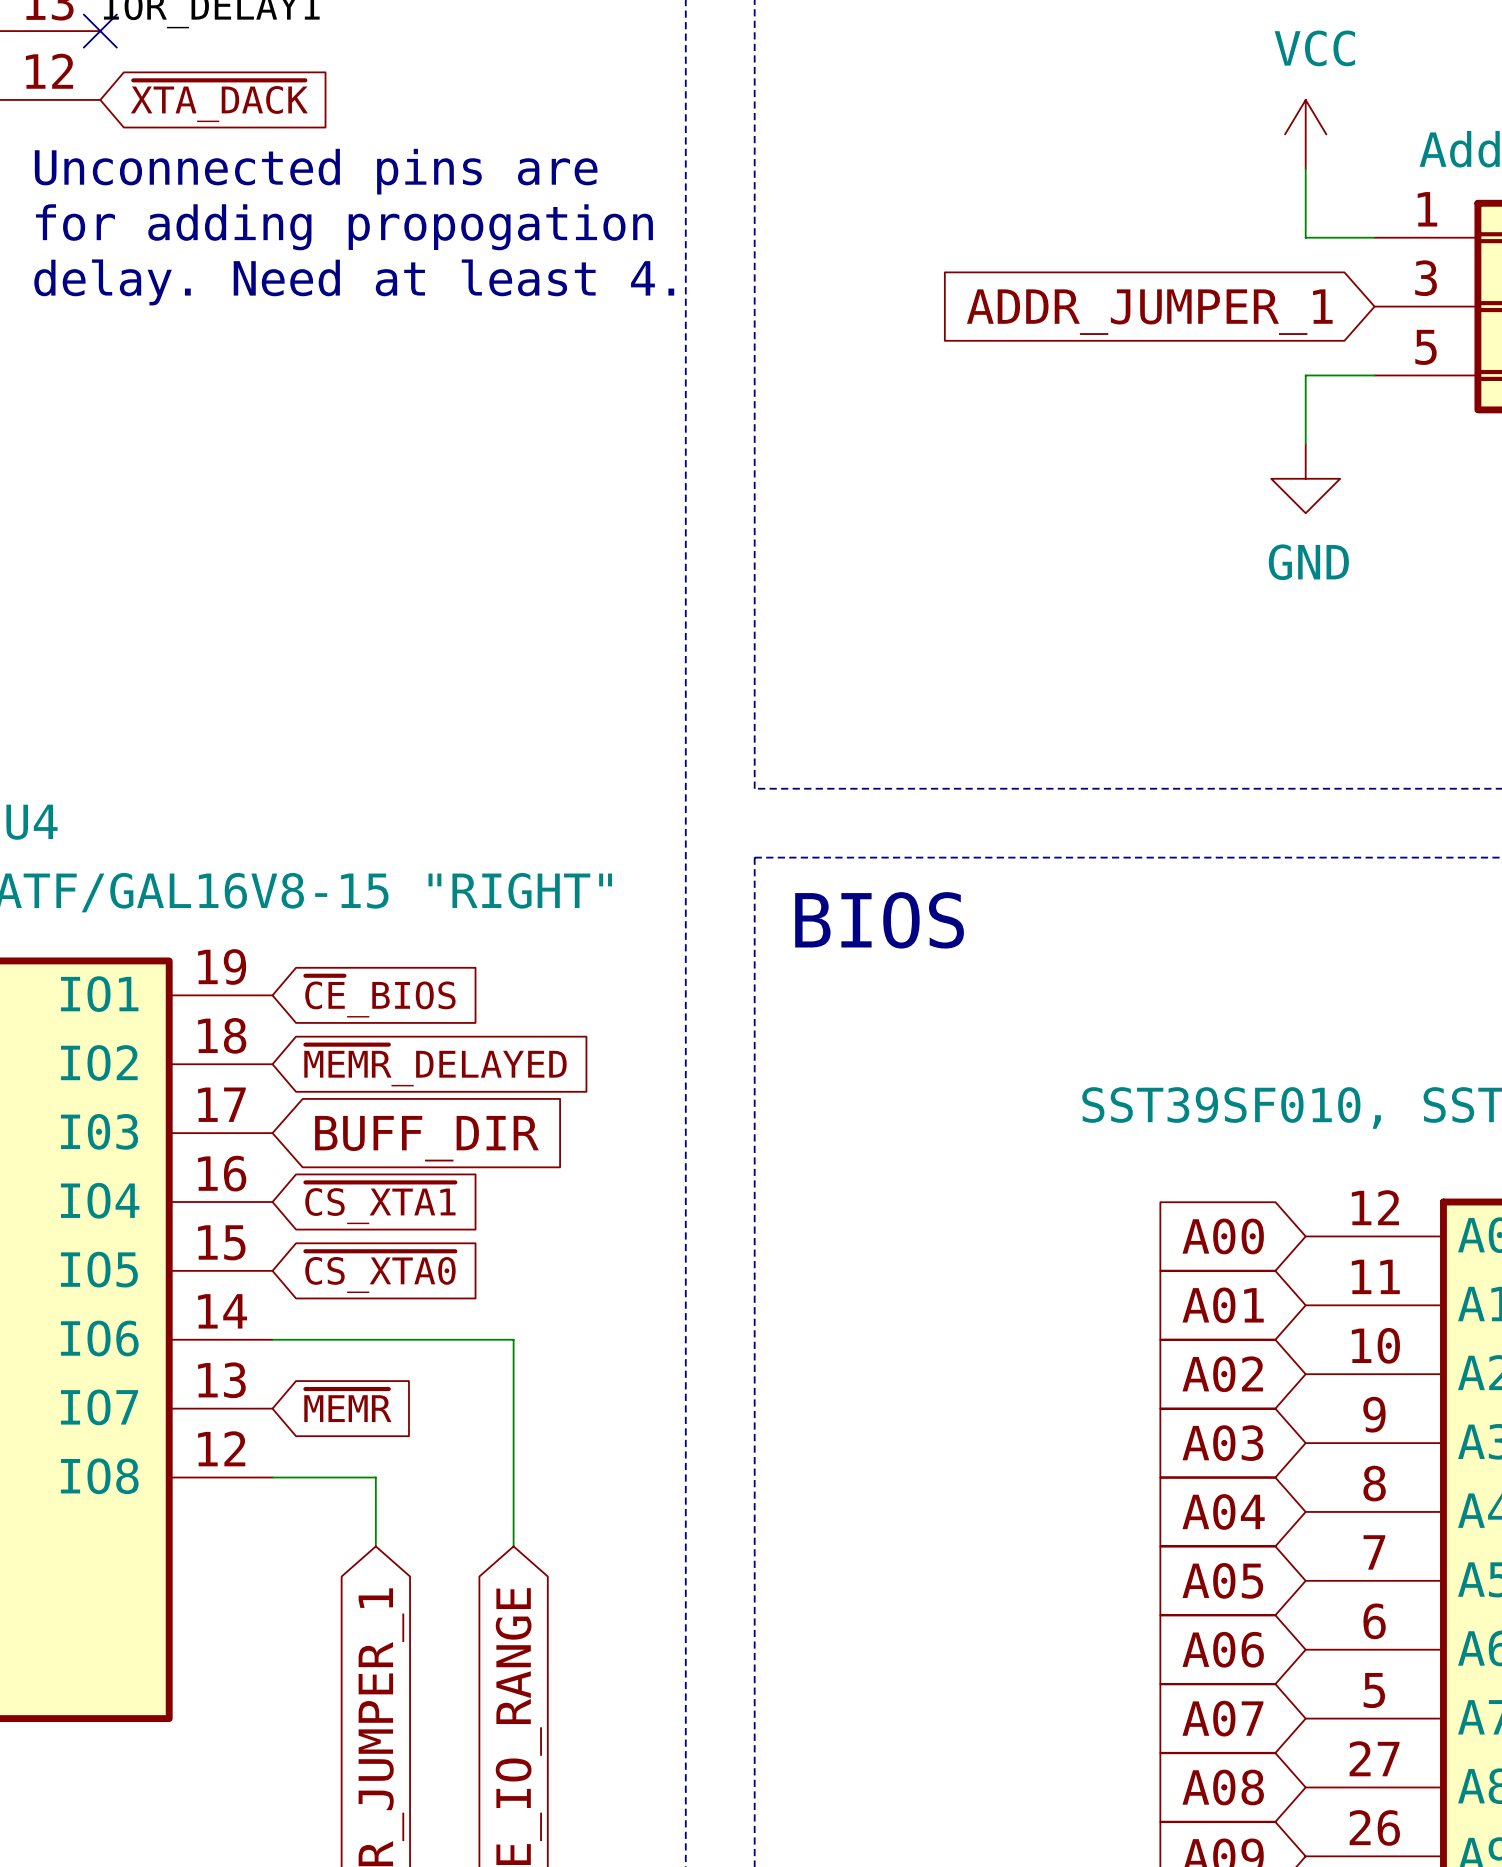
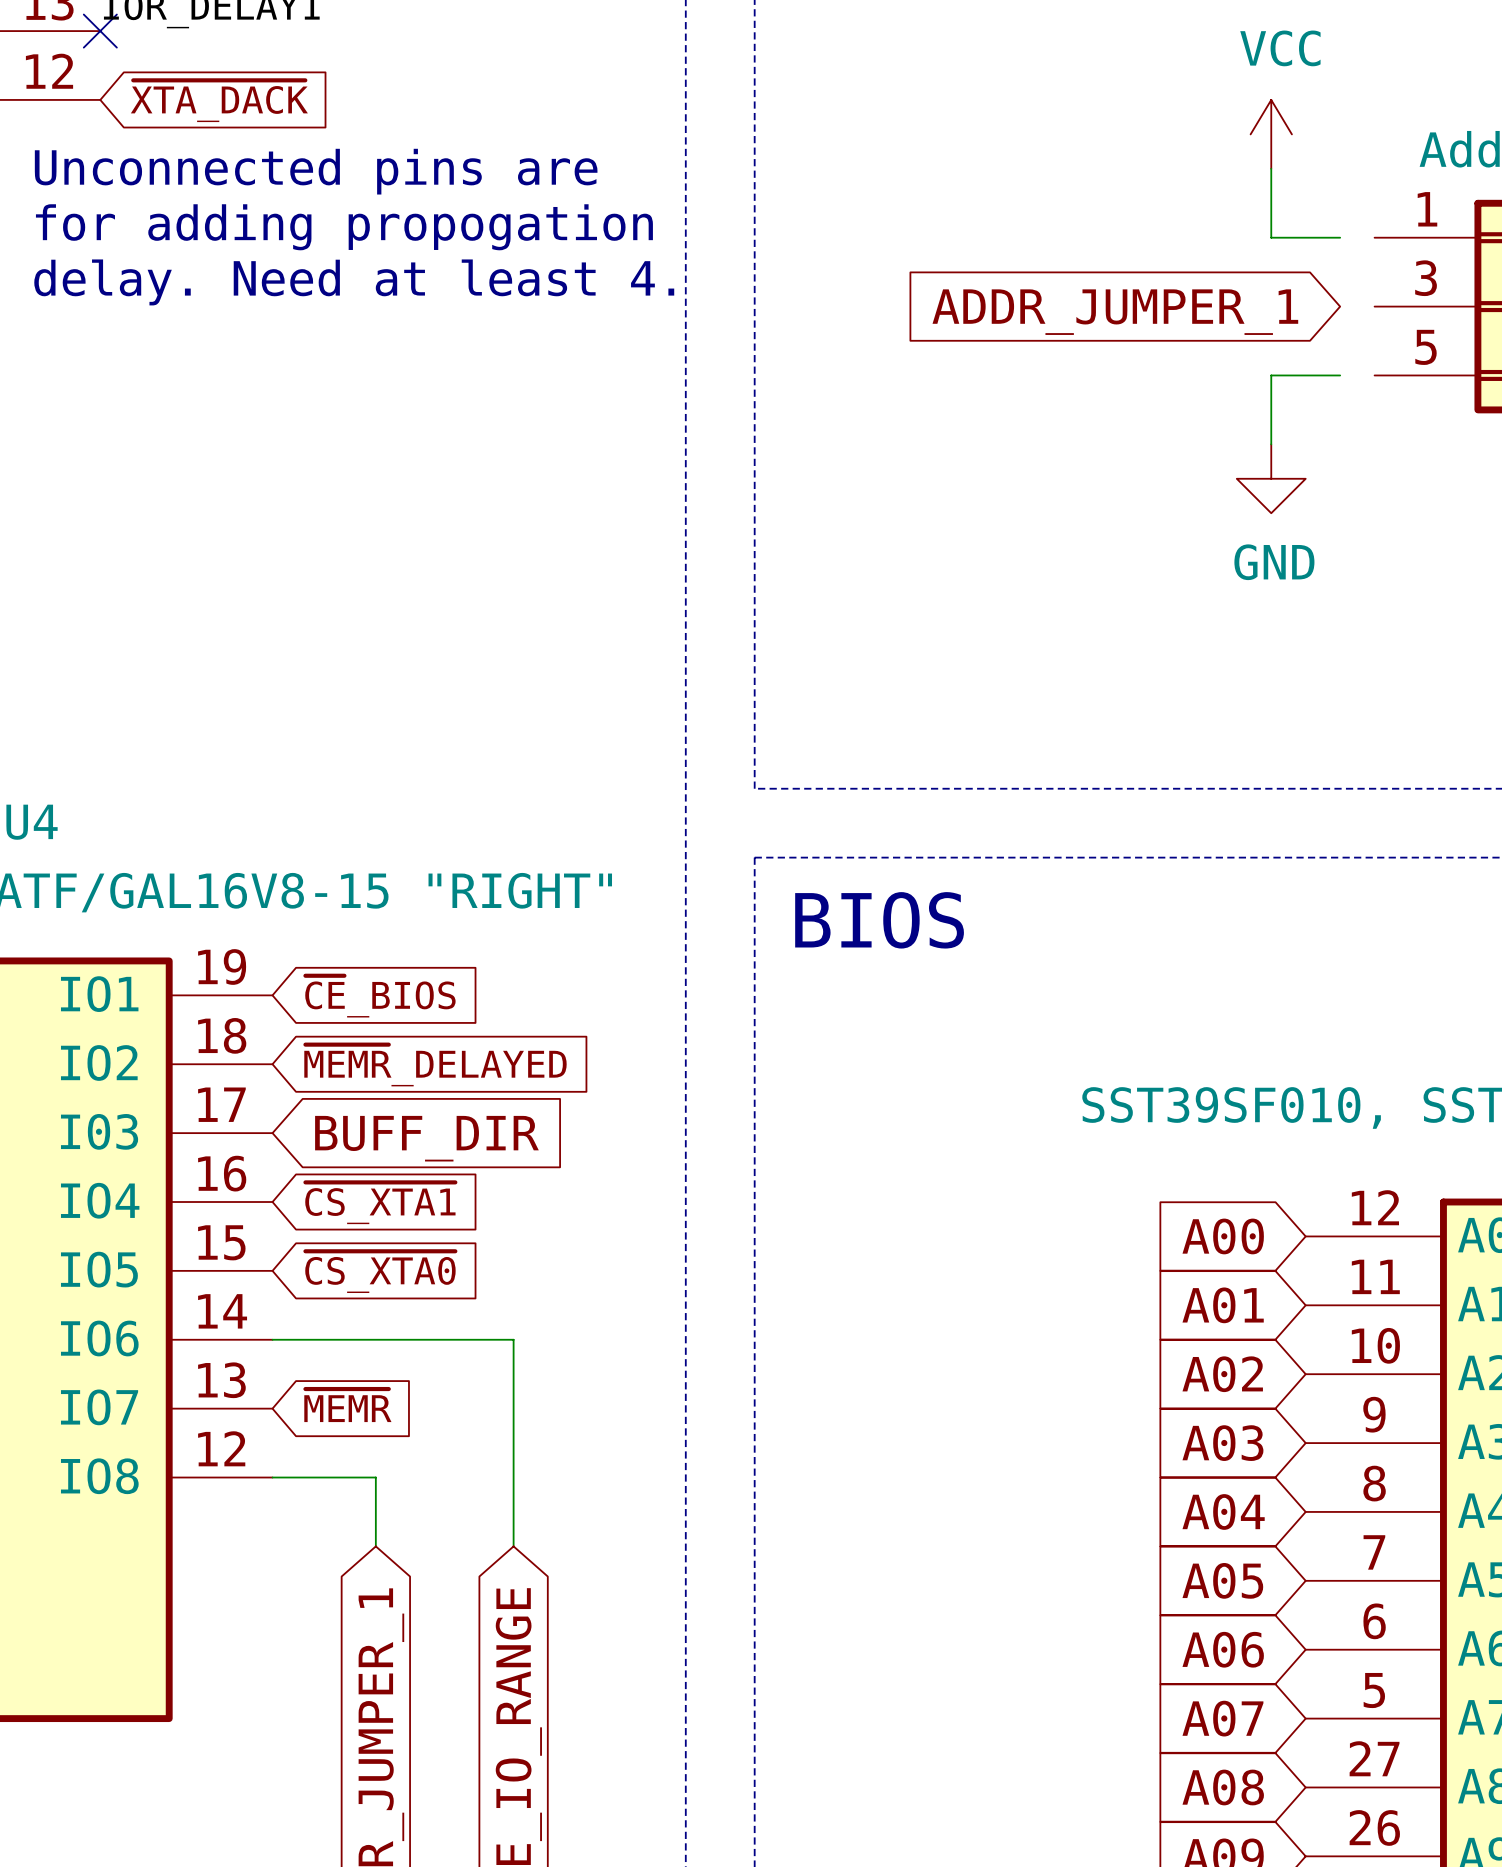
power symbol position: VCC (1305, 134) -> VCC (1271, 134)
wire: (1305, 168) (1305, 237) -> (1271, 168) (1271, 237) (1305, 237)
wire: (1340, 237) (1374, 237) -> none
global label position: ADDR_JUMPER_1 (1149, 312) -> ADDR_JUMPER_1 (1115, 312)
wire: (1305, 375) (1305, 444) -> (1305, 375) (1271, 375) (1271, 444)
wire: (1340, 375) (1374, 375) -> none
power symbol position: GND (1305, 478) -> GND (1271, 478)

